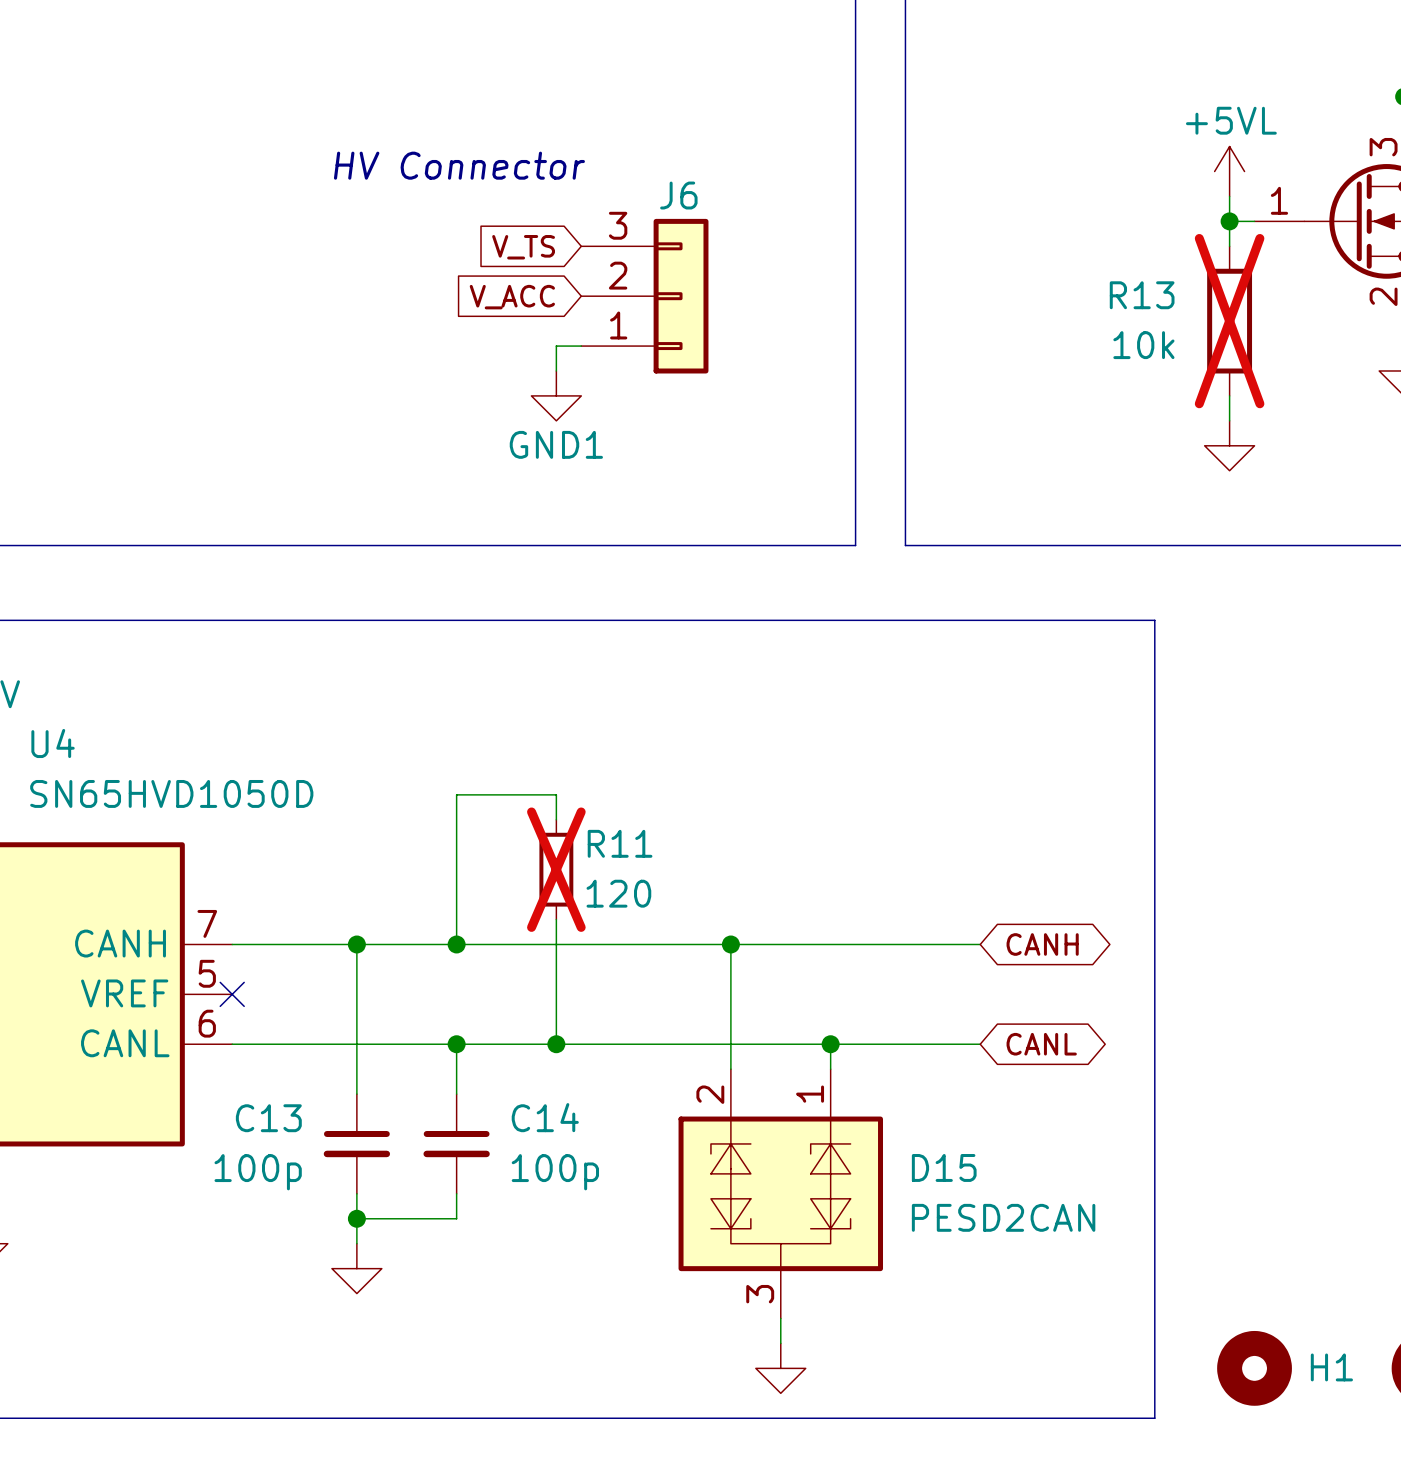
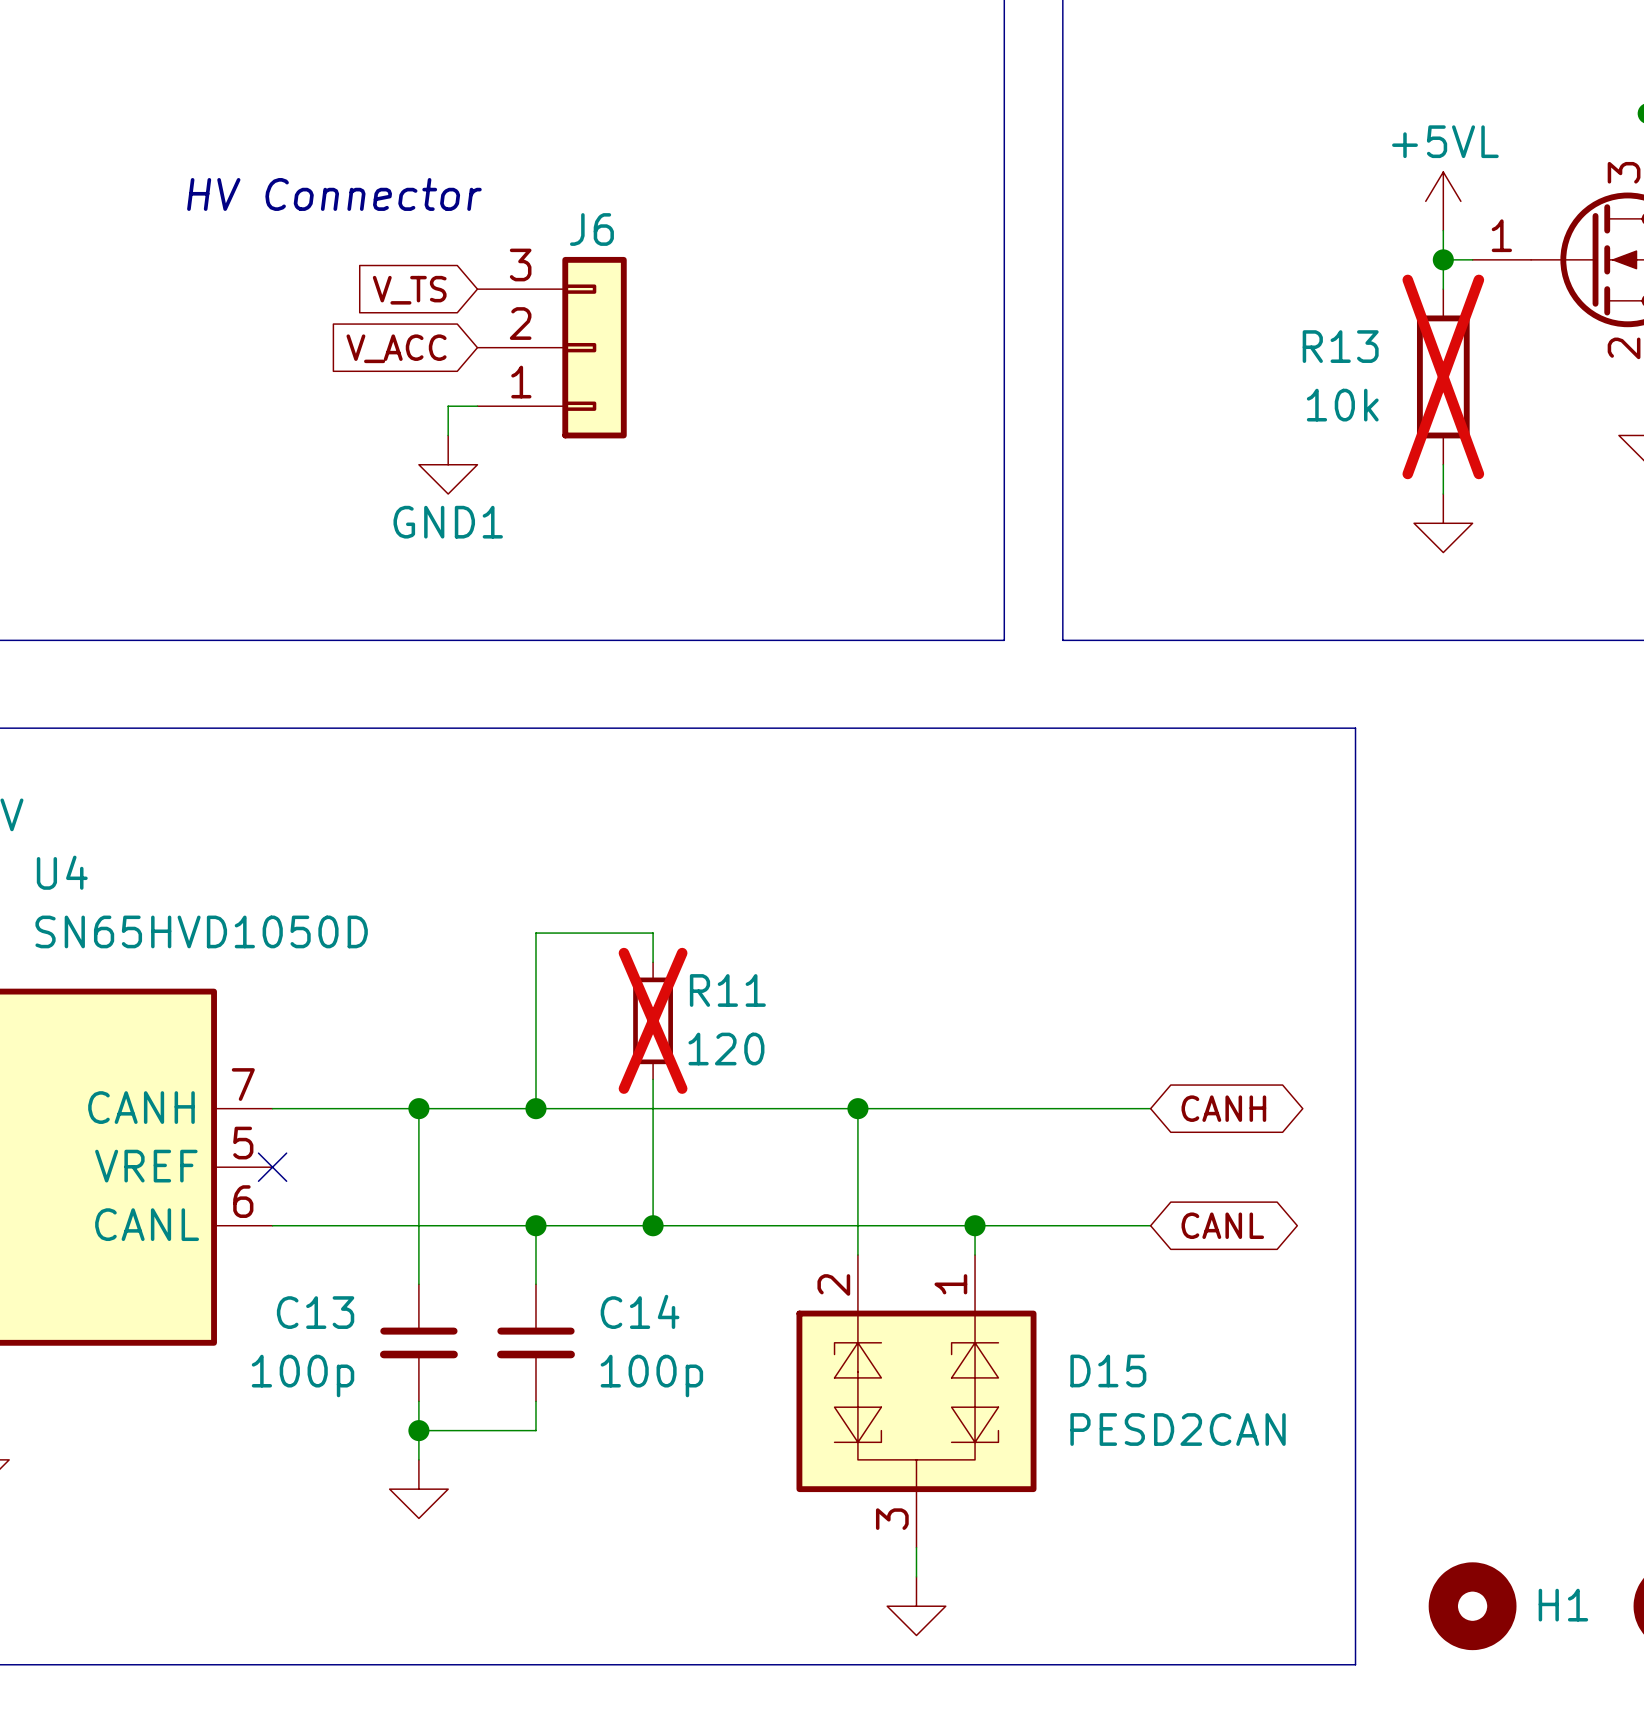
text position: HV Connector (459, 165) -> HV Connector (334, 194)
global label position: V_TS (523, 247) -> V_TS (409, 290)
J6 position: (644, 296) -> (552, 347)
global label position: V_ACC (512, 297) -> V_ACC (396, 348)
wire: (581, 346) (556, 346) (556, 370) -> (477, 406) (448, 406) (448, 435)
power symbol position: GND1 (556, 395) -> GND1 (448, 464)

